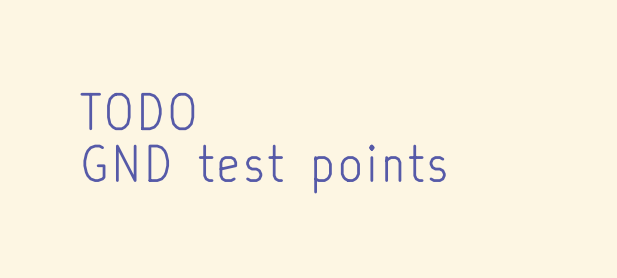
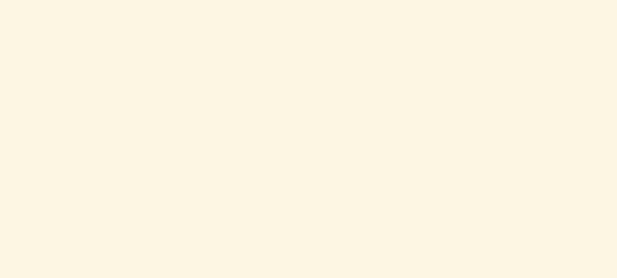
text: TODO (137, 111) -> none
text: GND test points (264, 169) -> none

